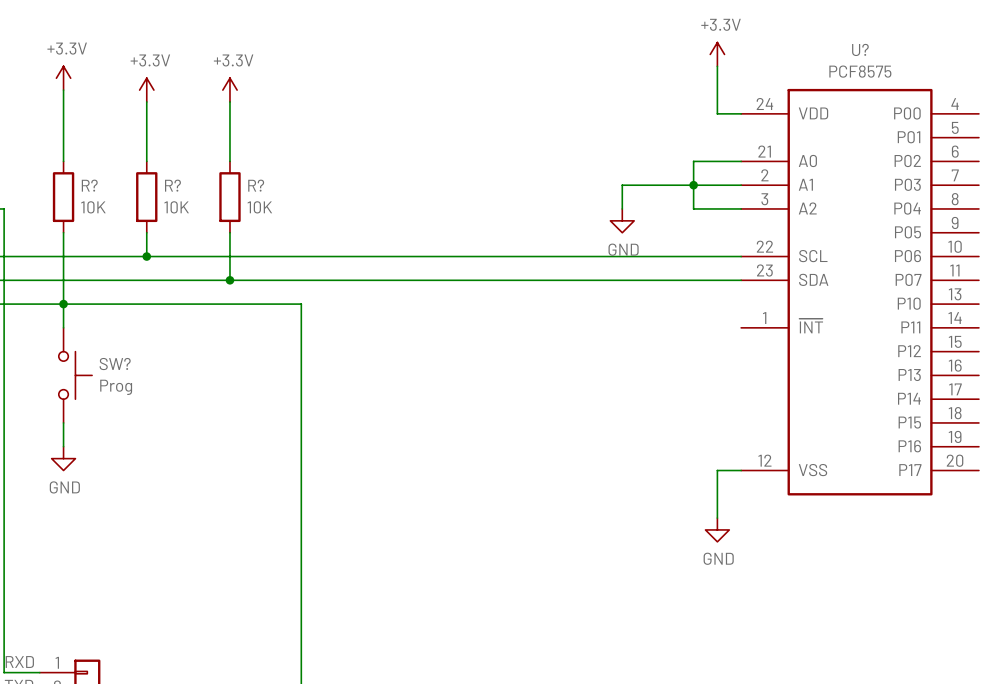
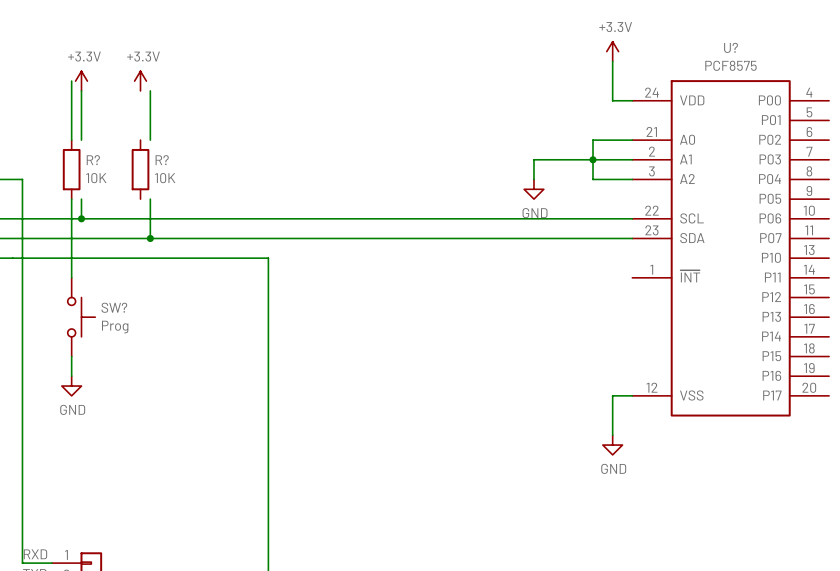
power symbol position: +3.3V (63, 78) -> +3.3V (81, 81)
power symbol: +3.3V (229, 90) -> none
wire: (146, 101) (146, 161) -> (81, 90) (81, 140)
wire: (229, 101) (229, 161) -> (150, 90) (150, 140)
R?: 10K (229, 197) -> none
wire: (146, 232) (146, 256) -> (81, 199) (81, 218)
wire: (229, 232) (229, 280) -> (150, 199) (150, 238)
junction: none -> (81, 218)
junction position: (146, 256) -> (150, 238)
junction: (229, 280) -> none
junction: (63, 304) -> none

